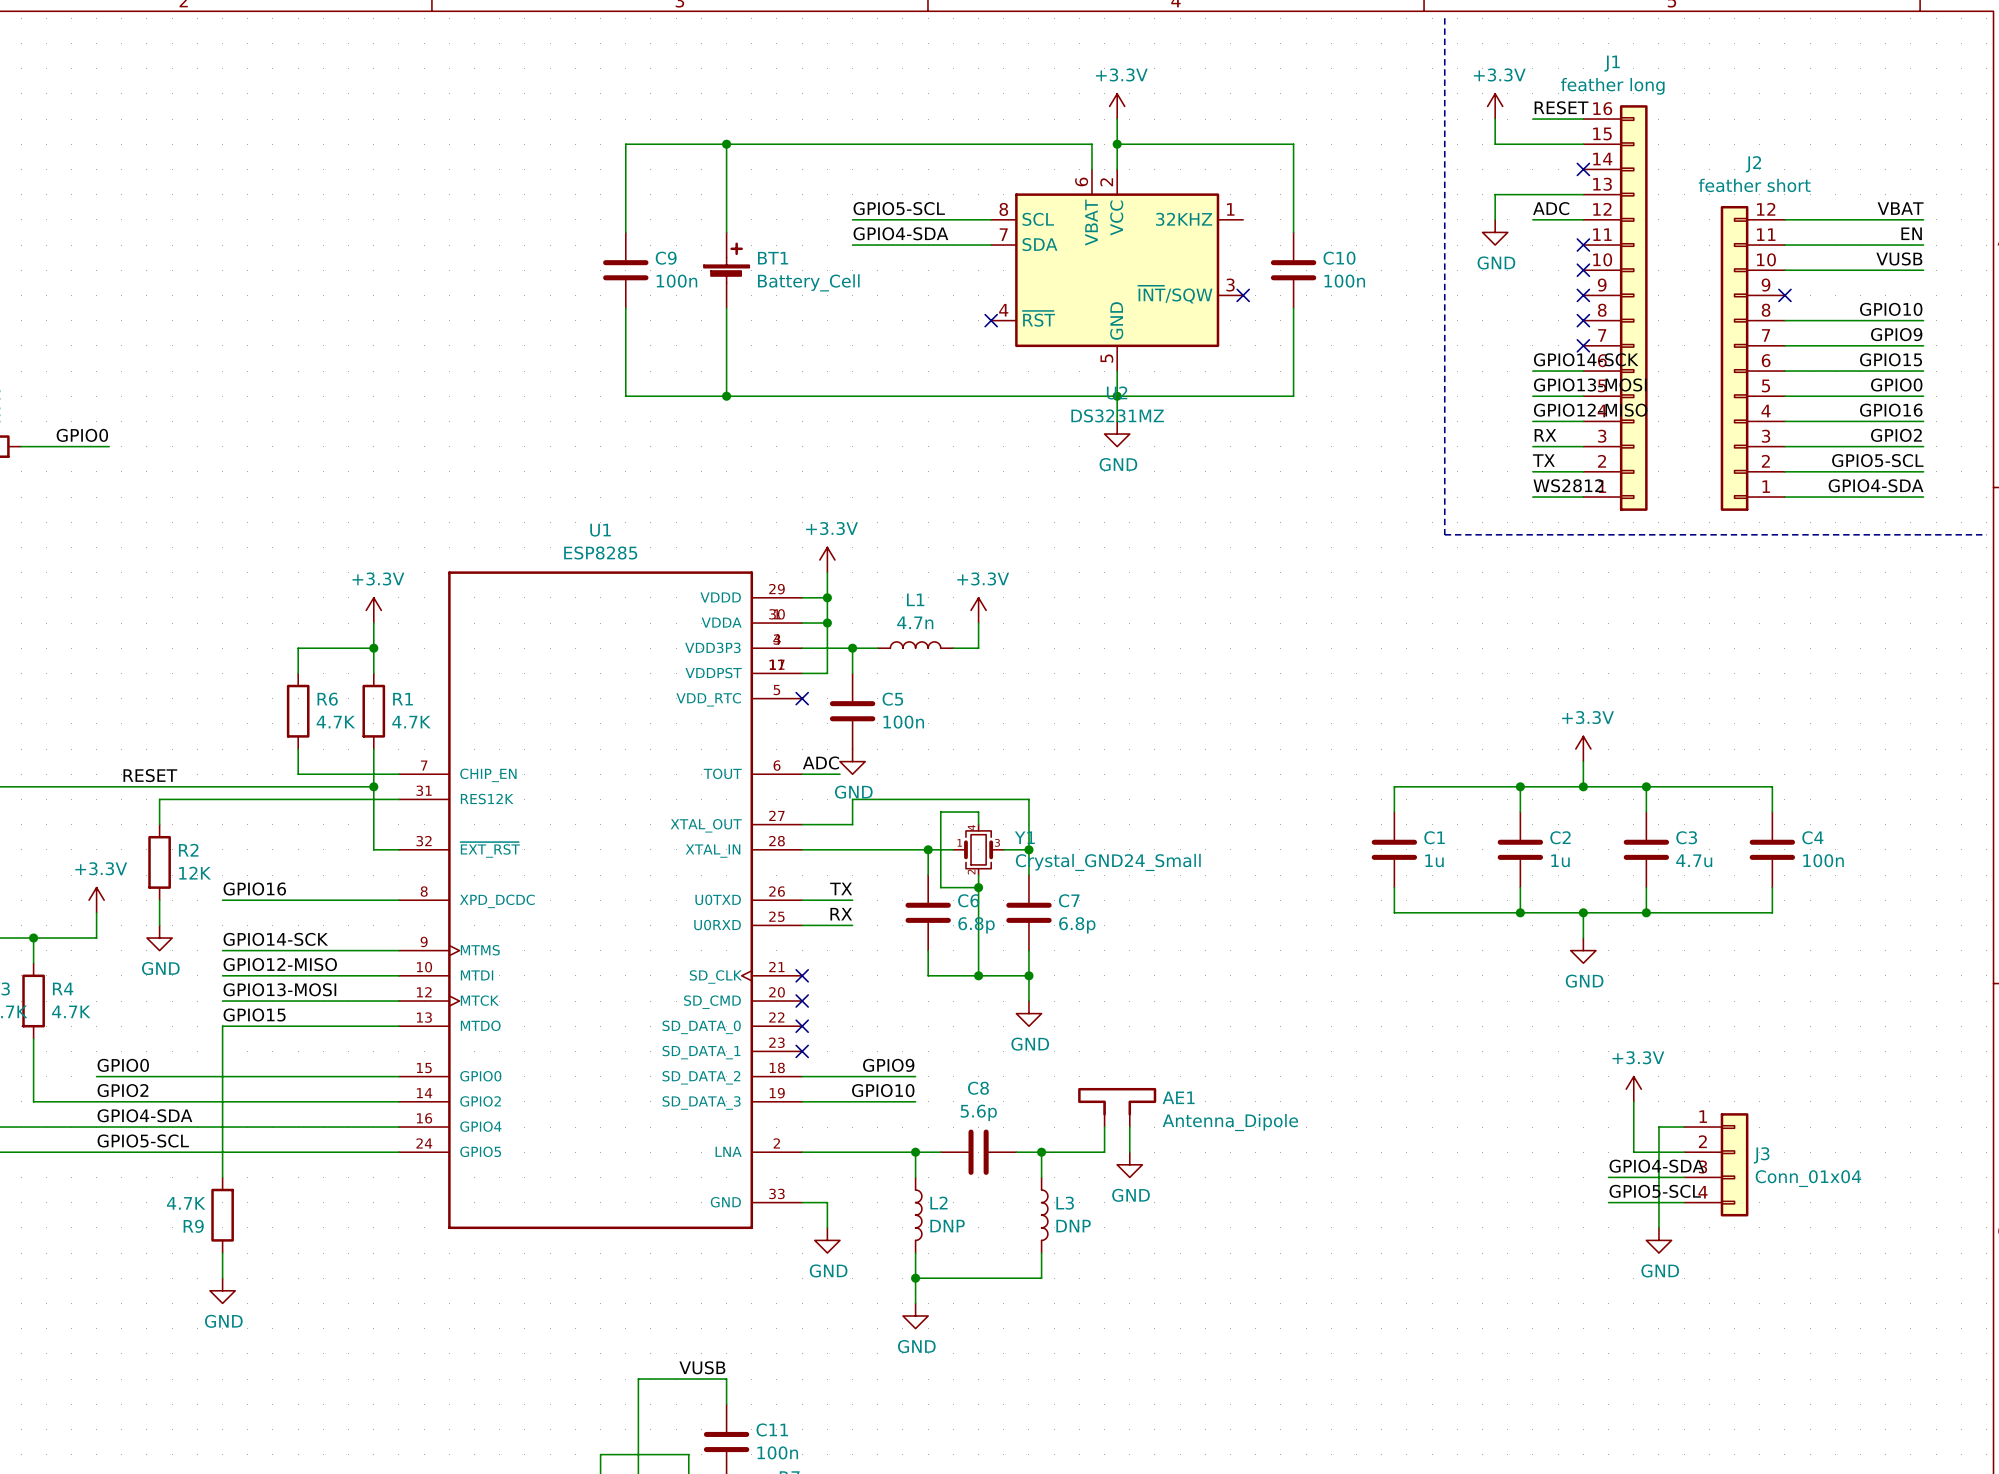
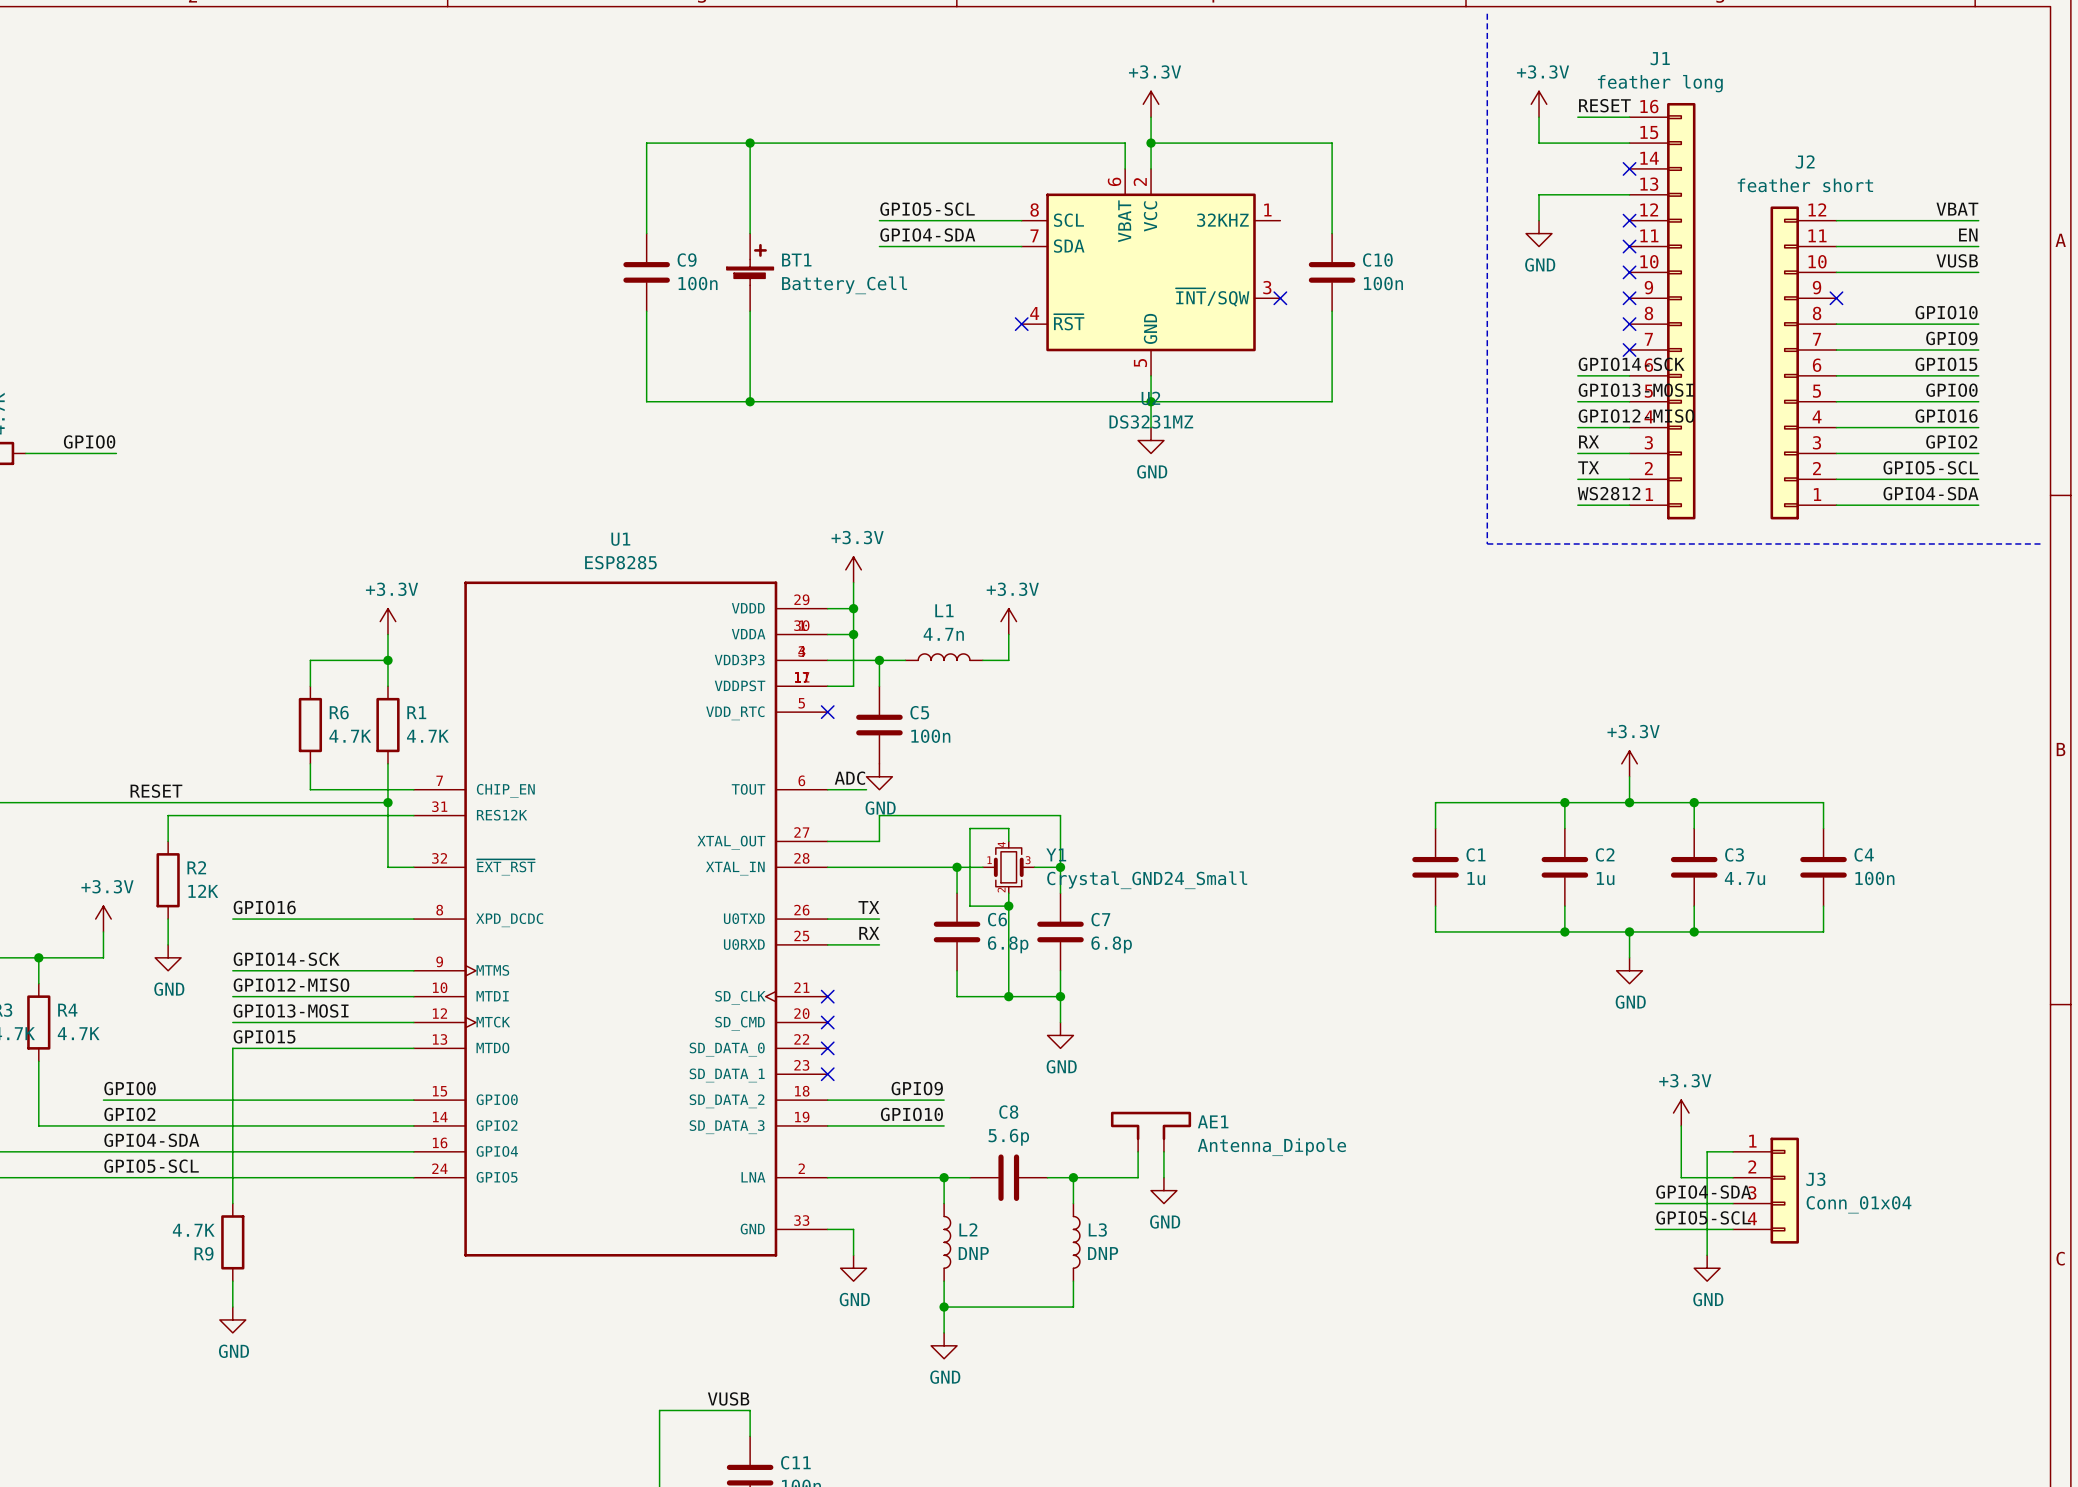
label: ADC (1551, 208) -> none
wire: (1532, 219) (1583, 219) -> none
no-connect mark: none -> (1629, 220)

